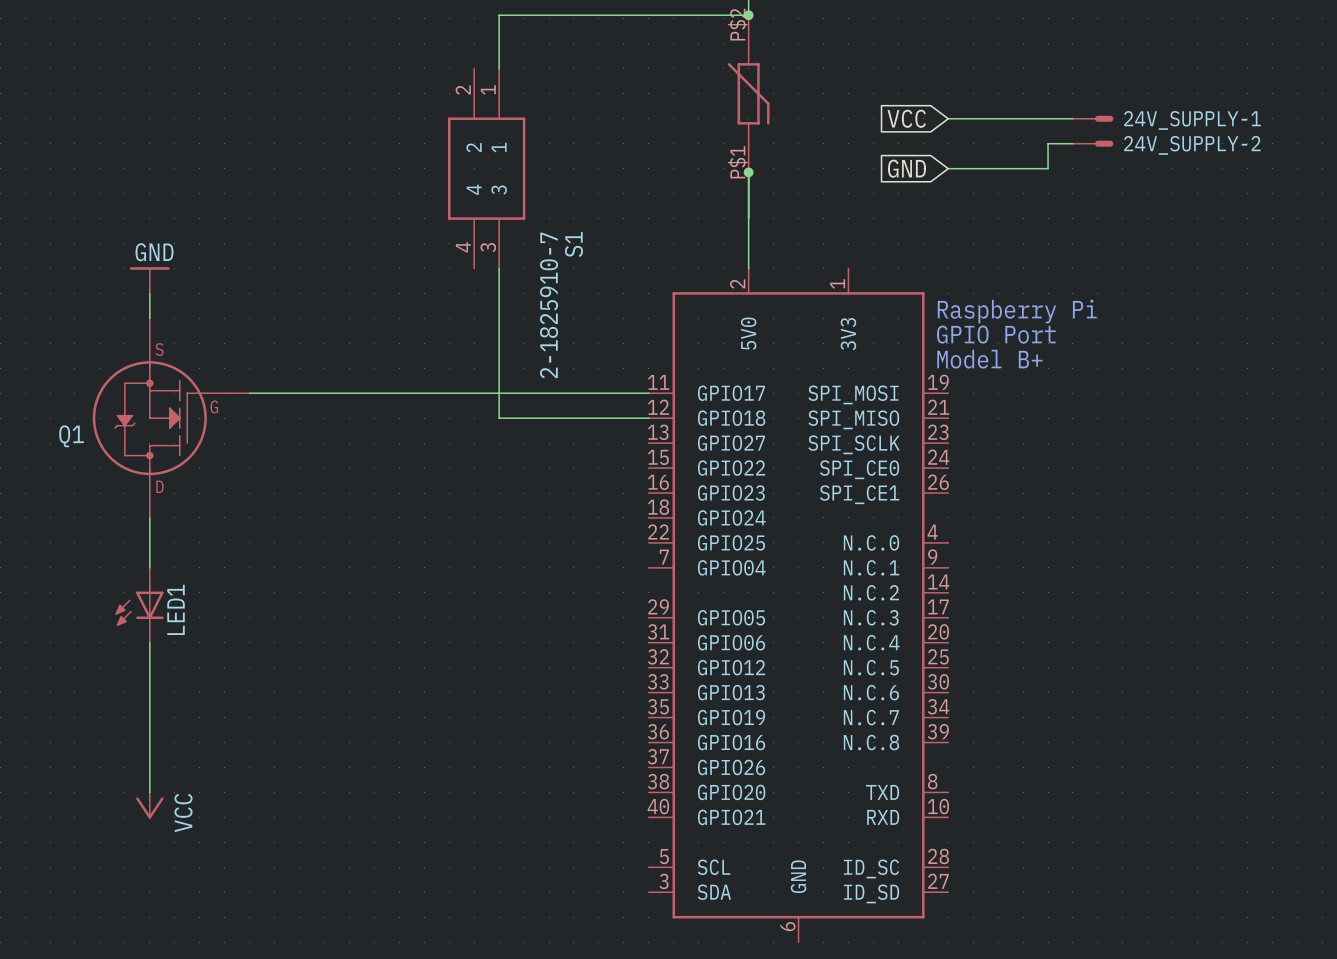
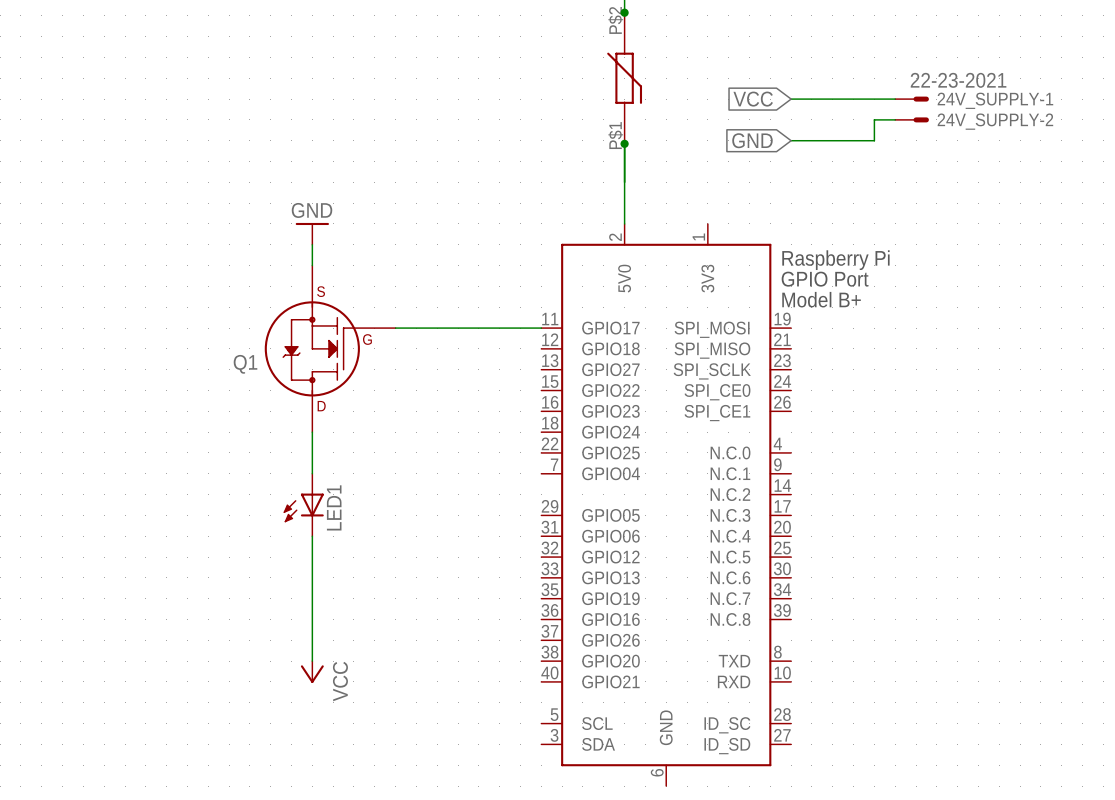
wire: (748, 15) (499, 15) (499, 68) -> none
24V_SUPPLY-1 value: none -> 22-23-2021 (958, 80)
S1: 2-1825910-7 (486, 168) -> none
wire: (499, 268) (499, 418) (648, 418) -> none
power symbol position: GND (149, 280) -> GND (312, 233)
wire: (149, 293) (149, 318) -> (312, 244) (312, 265)
wire: (249, 393) (474, 393) -> none
Q1 position: (171, 418) -> (330, 348)
wire: (149, 517) (149, 567) -> (312, 432) (312, 473)
LED1 position: (139, 605) -> (303, 505)
wire: (149, 642) (149, 792) -> (312, 536) (312, 661)
power symbol position: VCC (149, 805) -> VCC (312, 672)

